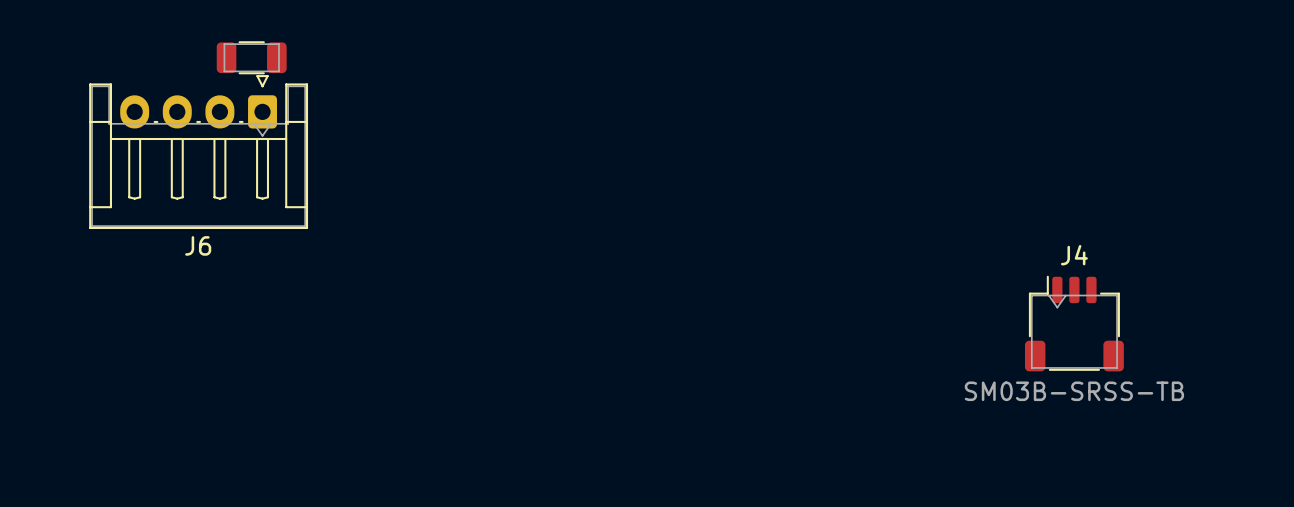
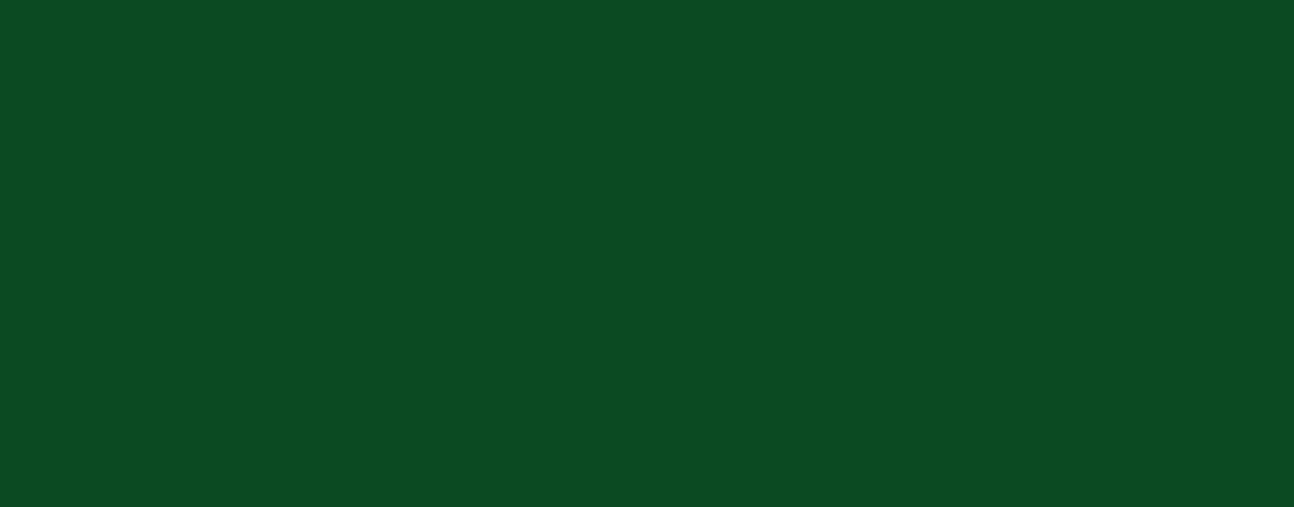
part: (251, 57) -> none
J6: (198, 152) -> none
J4: SM03B-SRSS-TB (1074, 323) -> none

